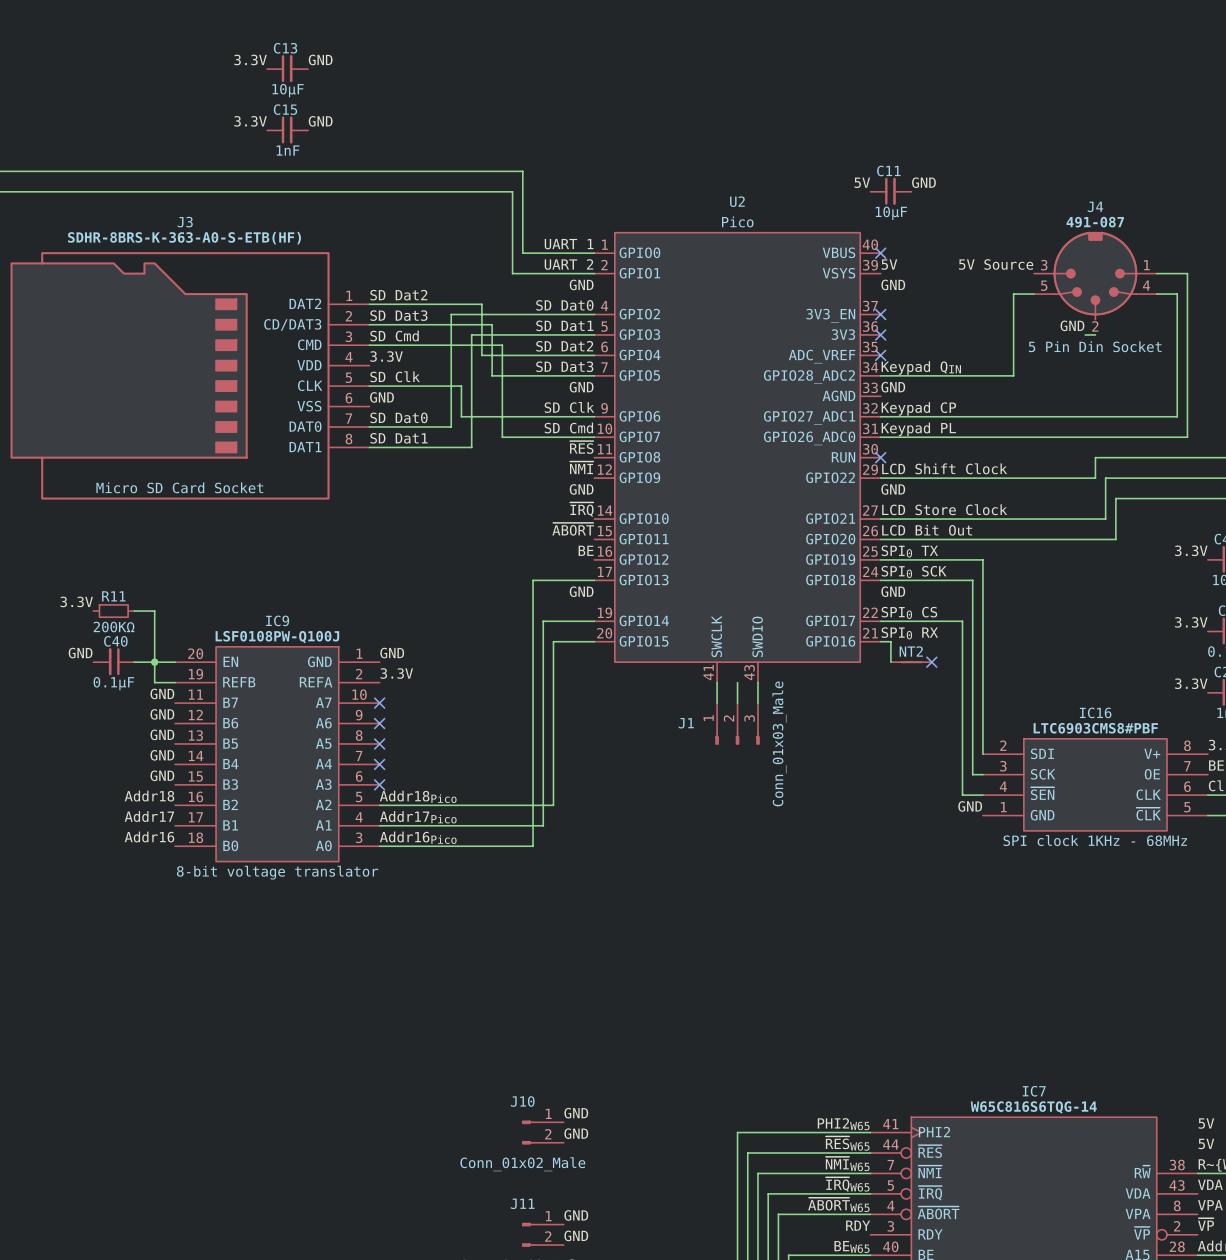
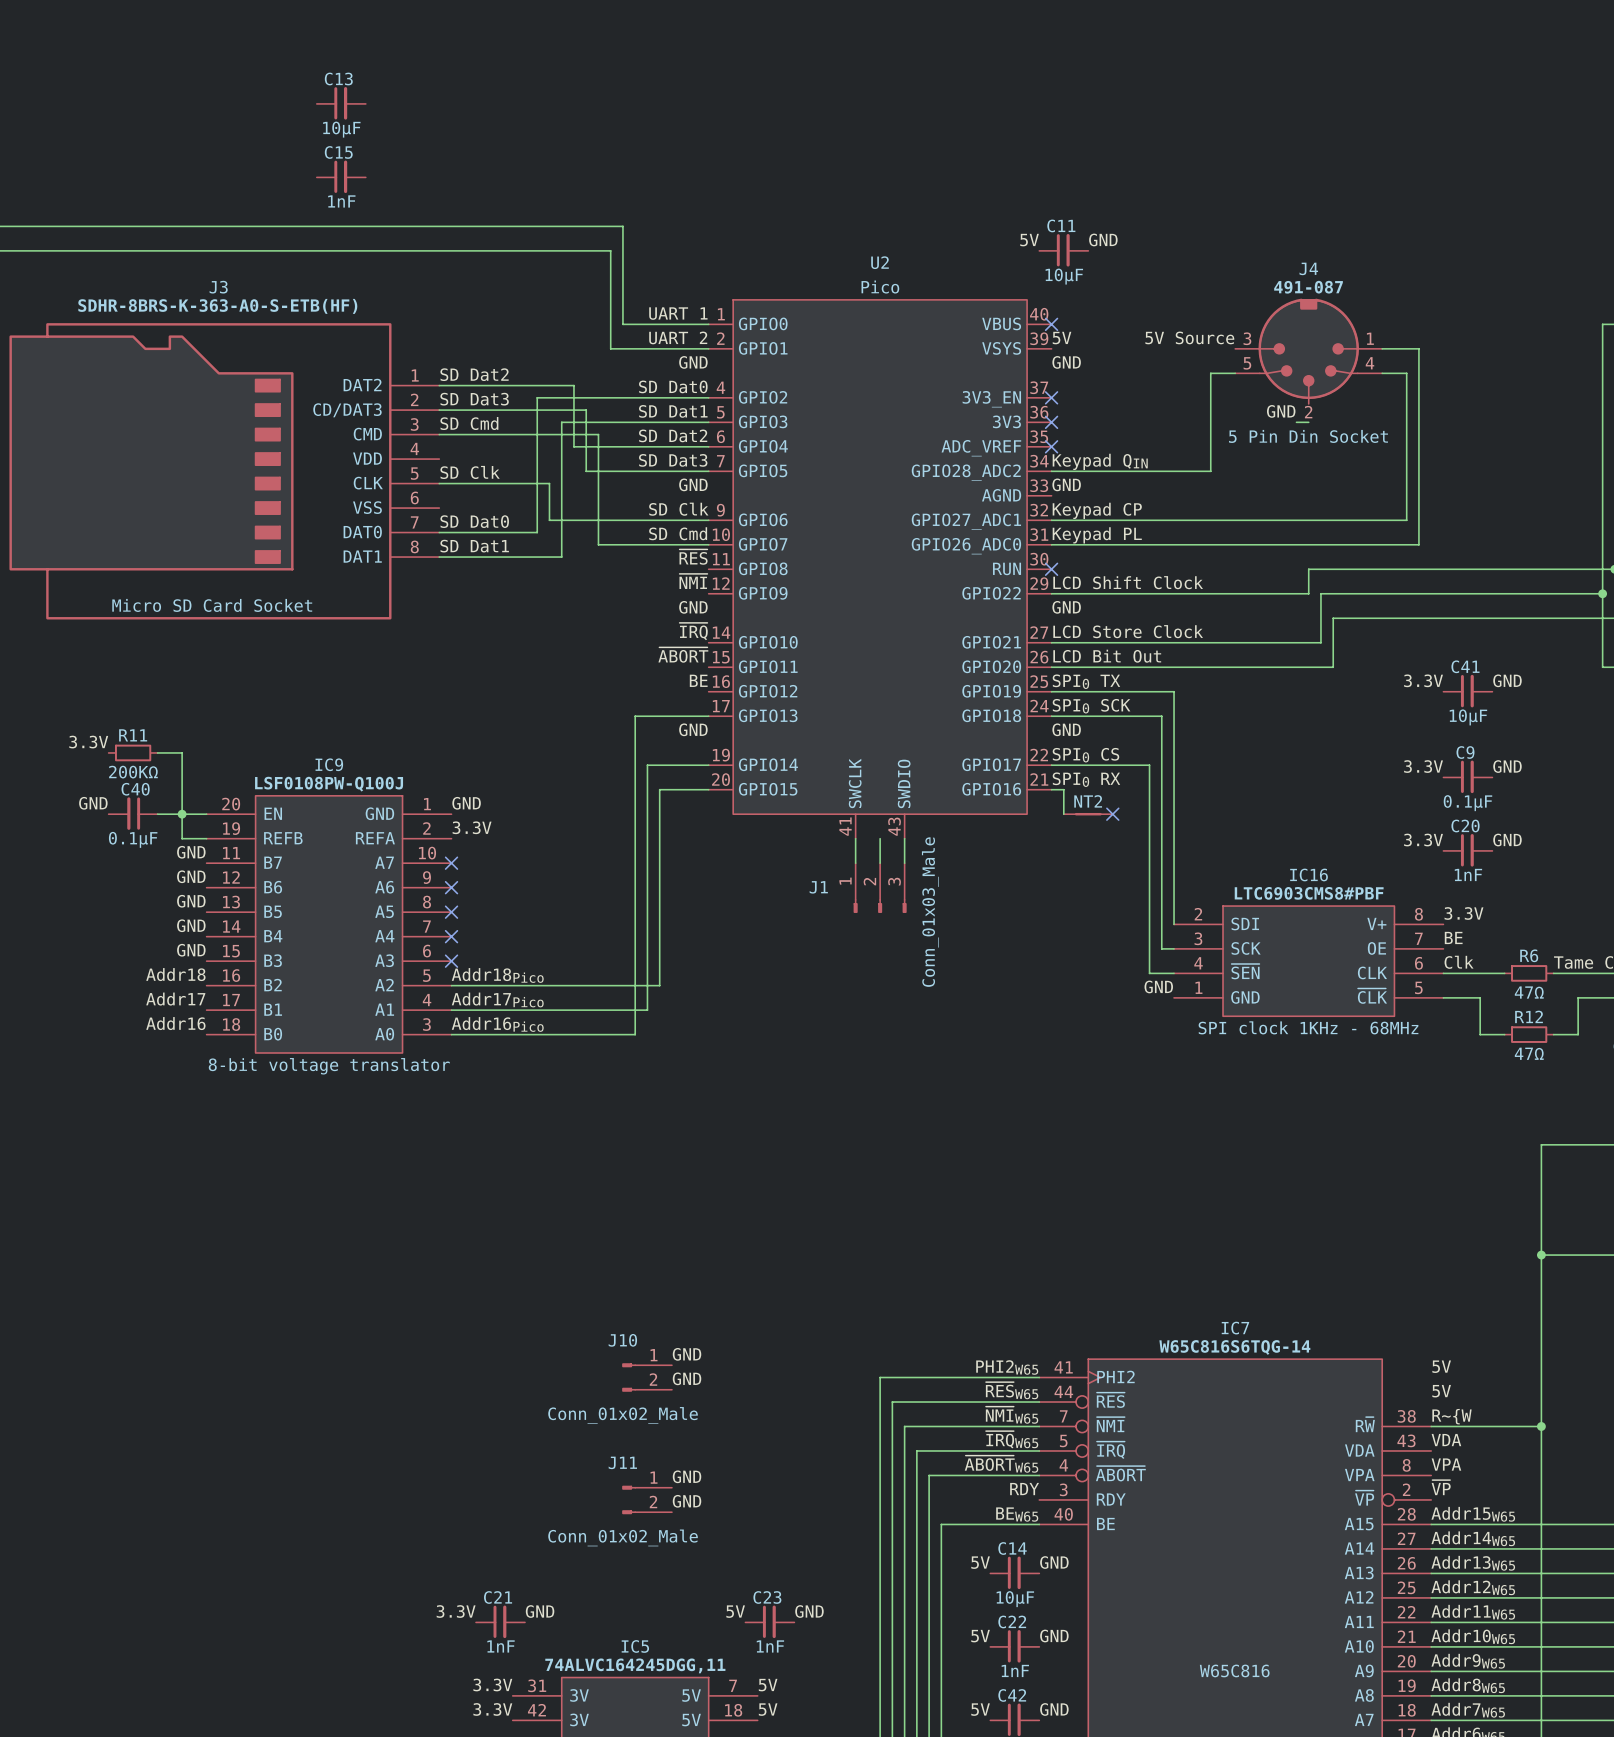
label: 3.3V (250, 59) -> none
label: GND (320, 59) -> none
label: 3.3V (250, 121) -> none
label: GND (320, 121) -> none
label: 3.3V (386, 356) -> none
label: GND (382, 397) -> none

